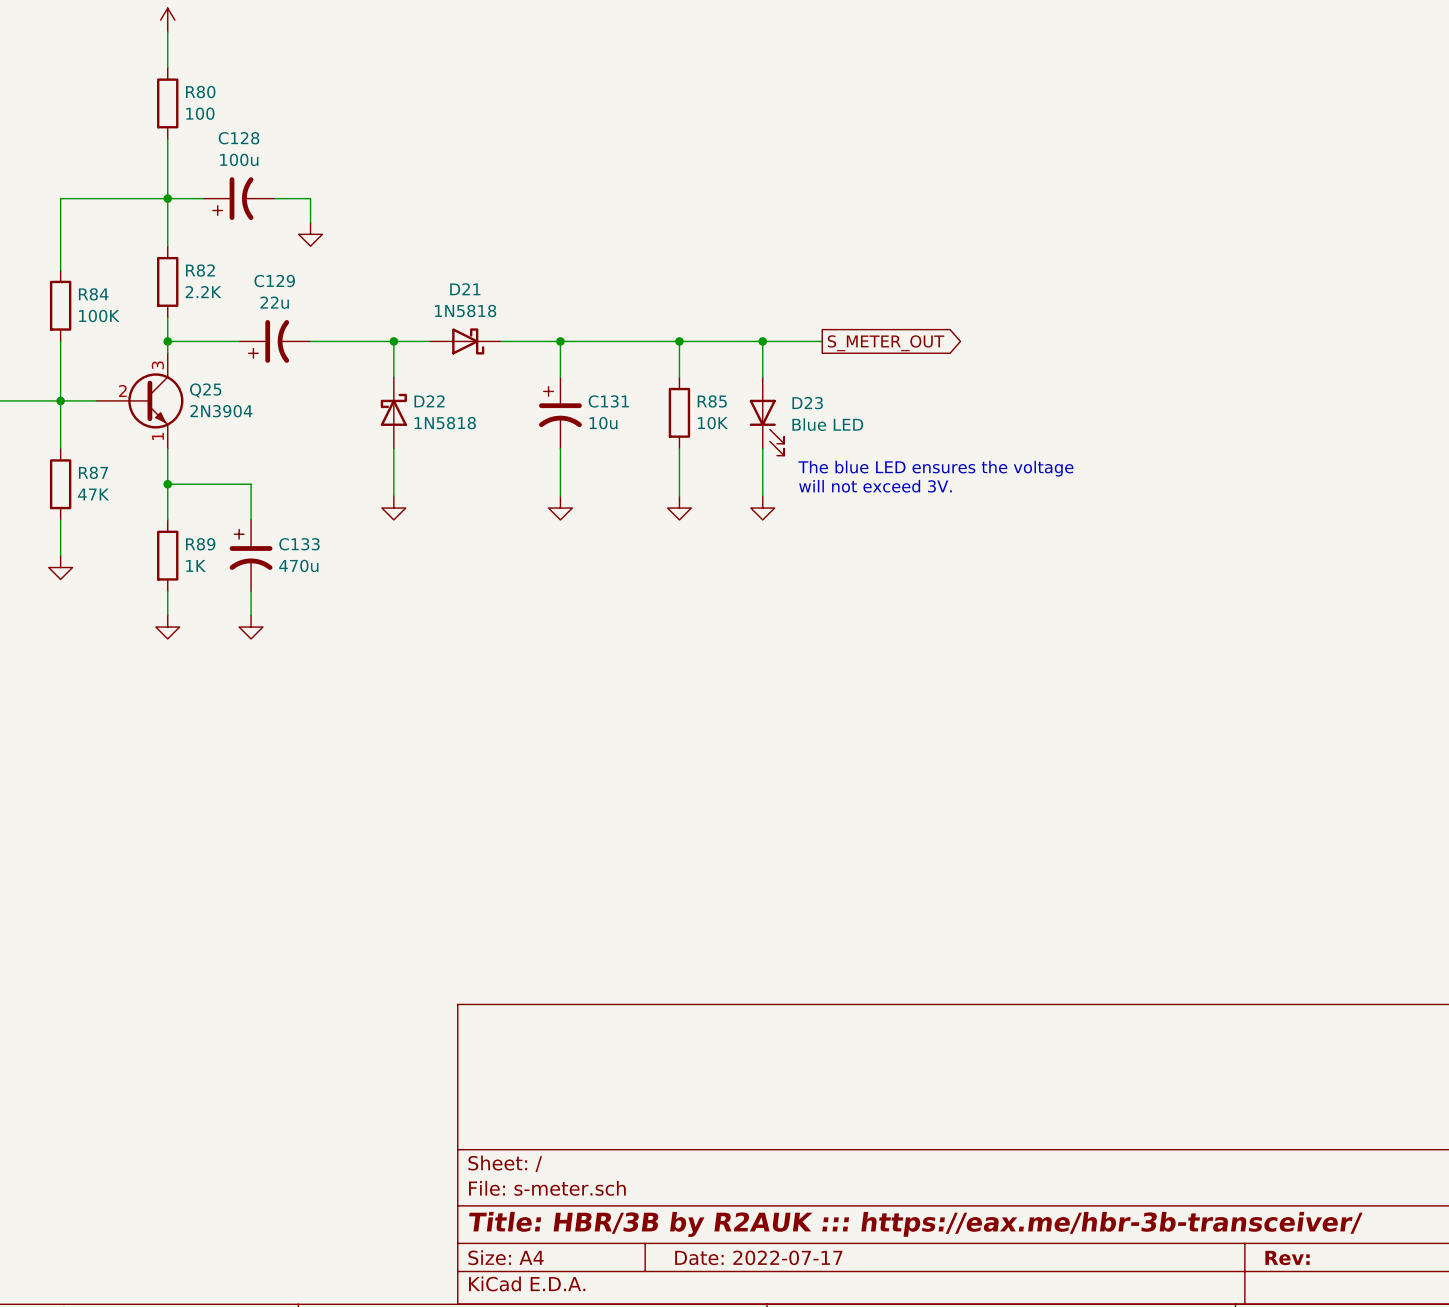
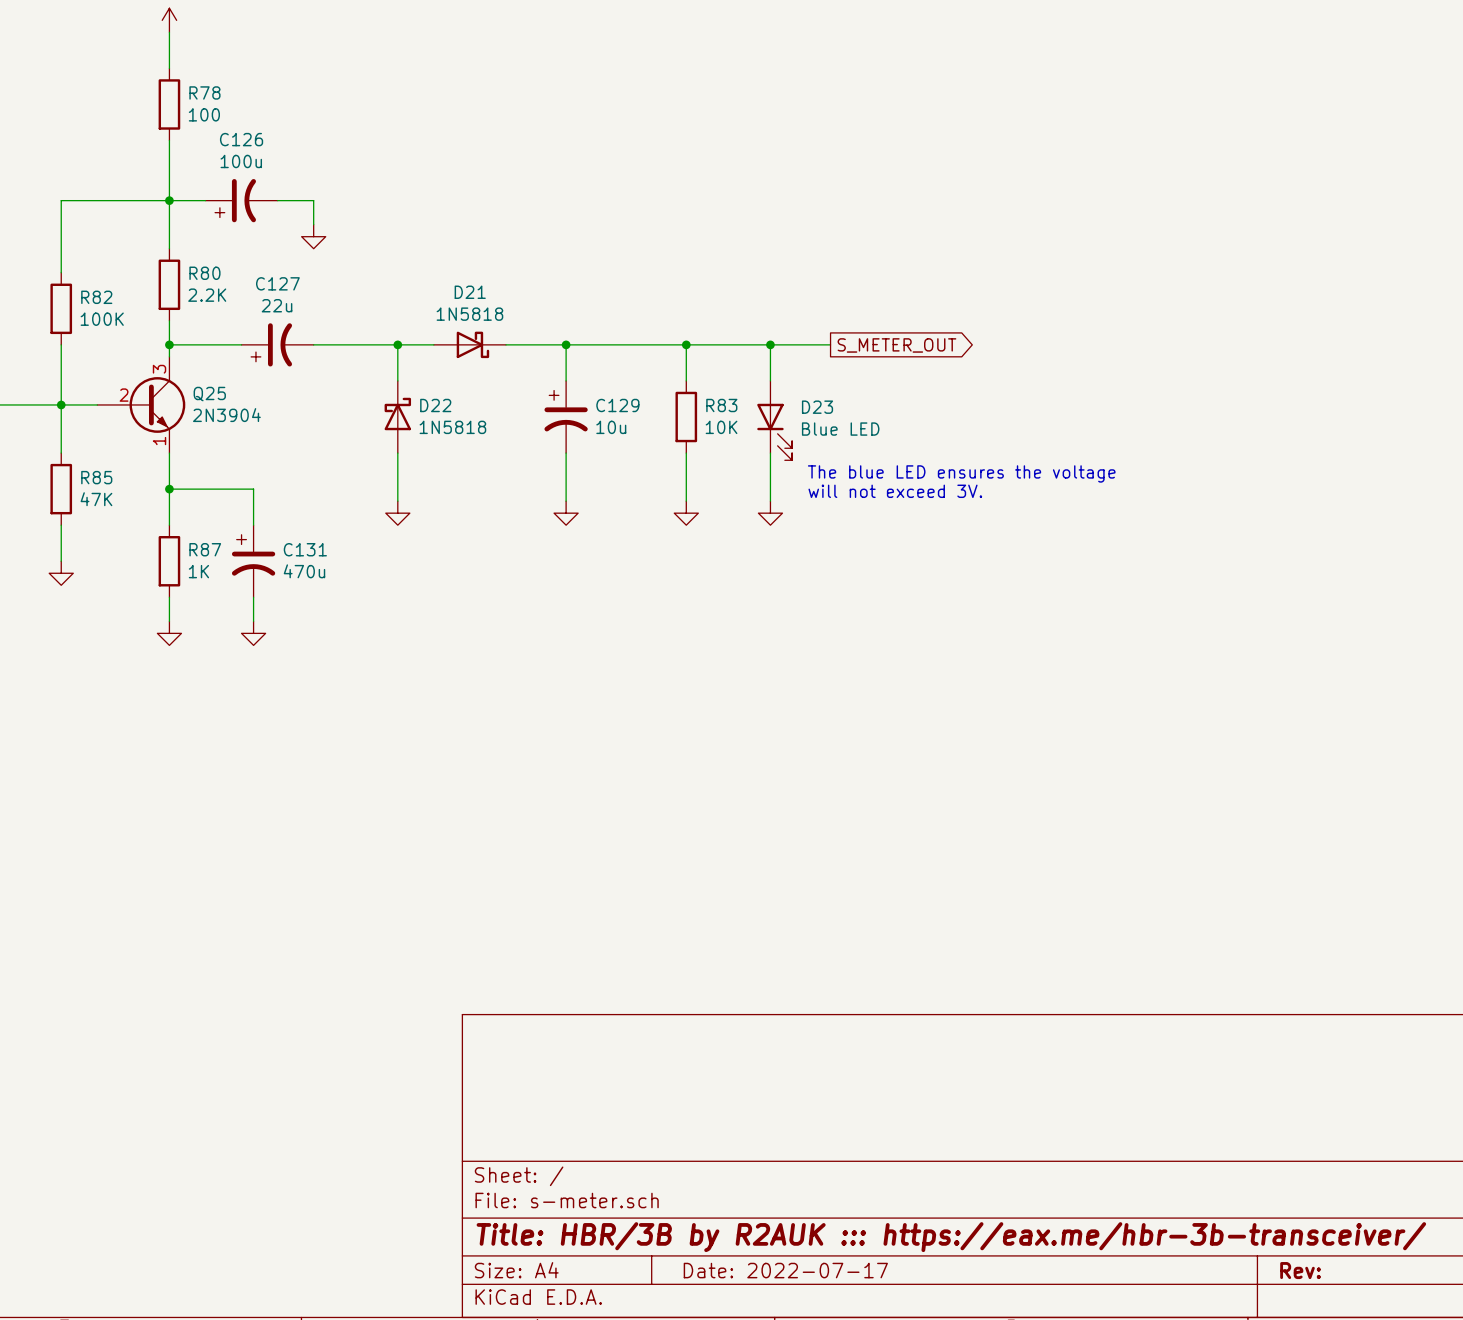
R80 name: R80 (200, 92) -> R78 (204, 92)
C128 name: C128 (239, 138) -> C126 (241, 139)
R82 name: R82 (200, 270) -> R80 (204, 273)
C129 name: C129 (274, 281) -> C127 (277, 283)
R84 name: R84 (93, 294) -> R82 (96, 297)
C131 name: C131 (608, 401) -> C129 (617, 405)
R85 name: R85 (712, 401) -> R83 (721, 405)
R87 name: R87 (93, 472) -> R85 (96, 477)
R89 name: R89 (200, 544) -> R87 (205, 549)
C133 name: C133 (299, 544) -> C131 (305, 549)

